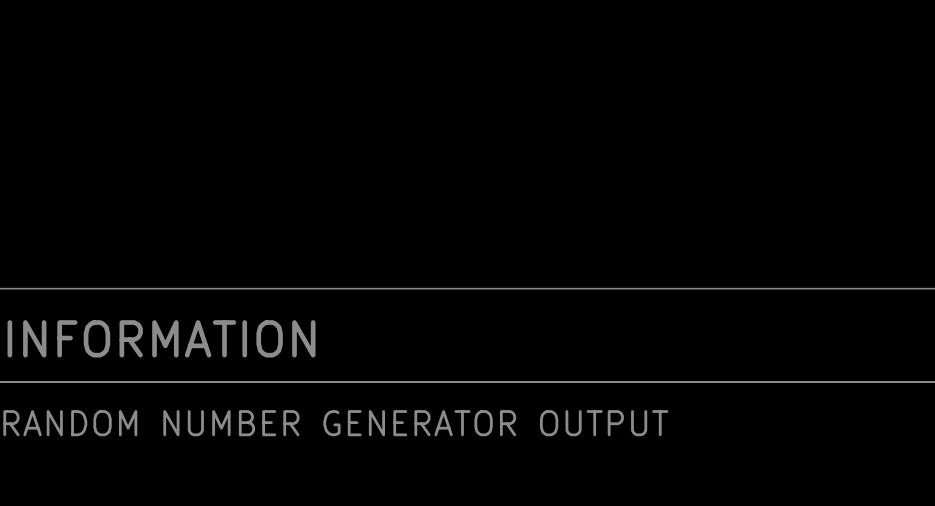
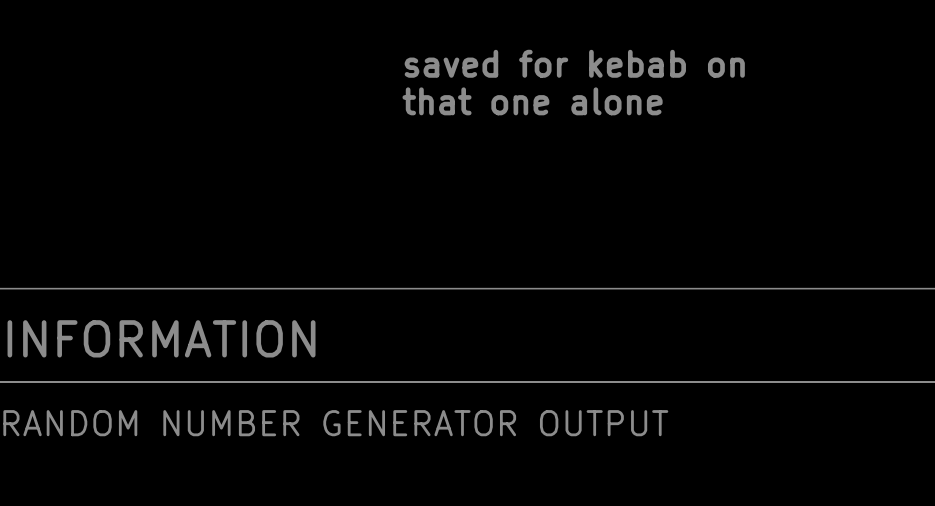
text: none -> saved for kebab on (574, 63)
text: none -> that one alone (532, 101)

